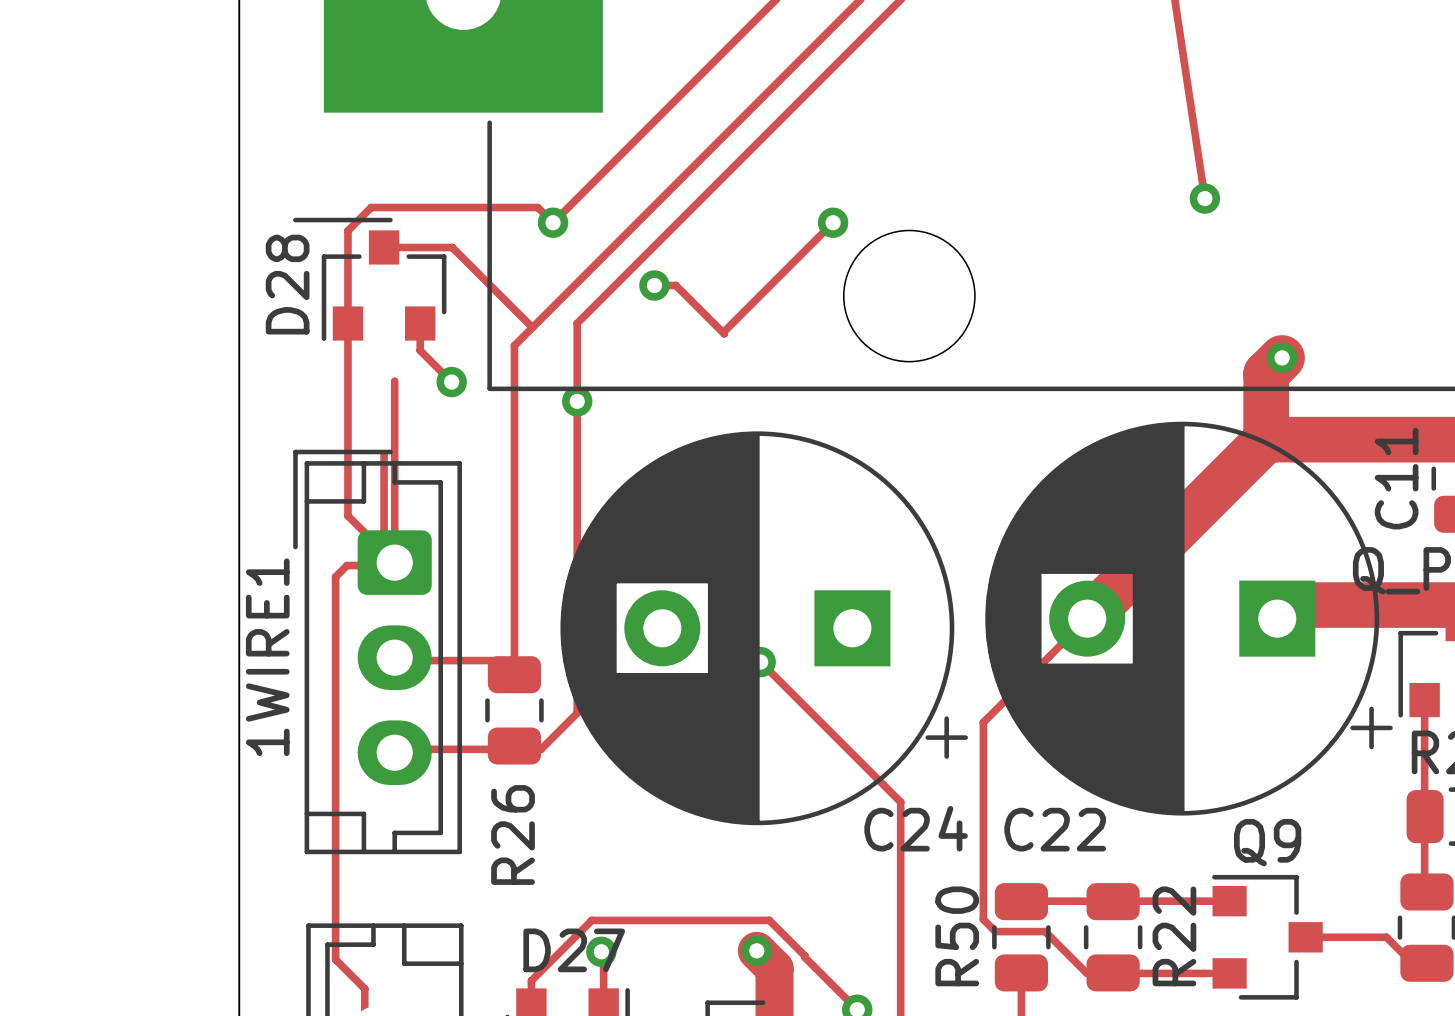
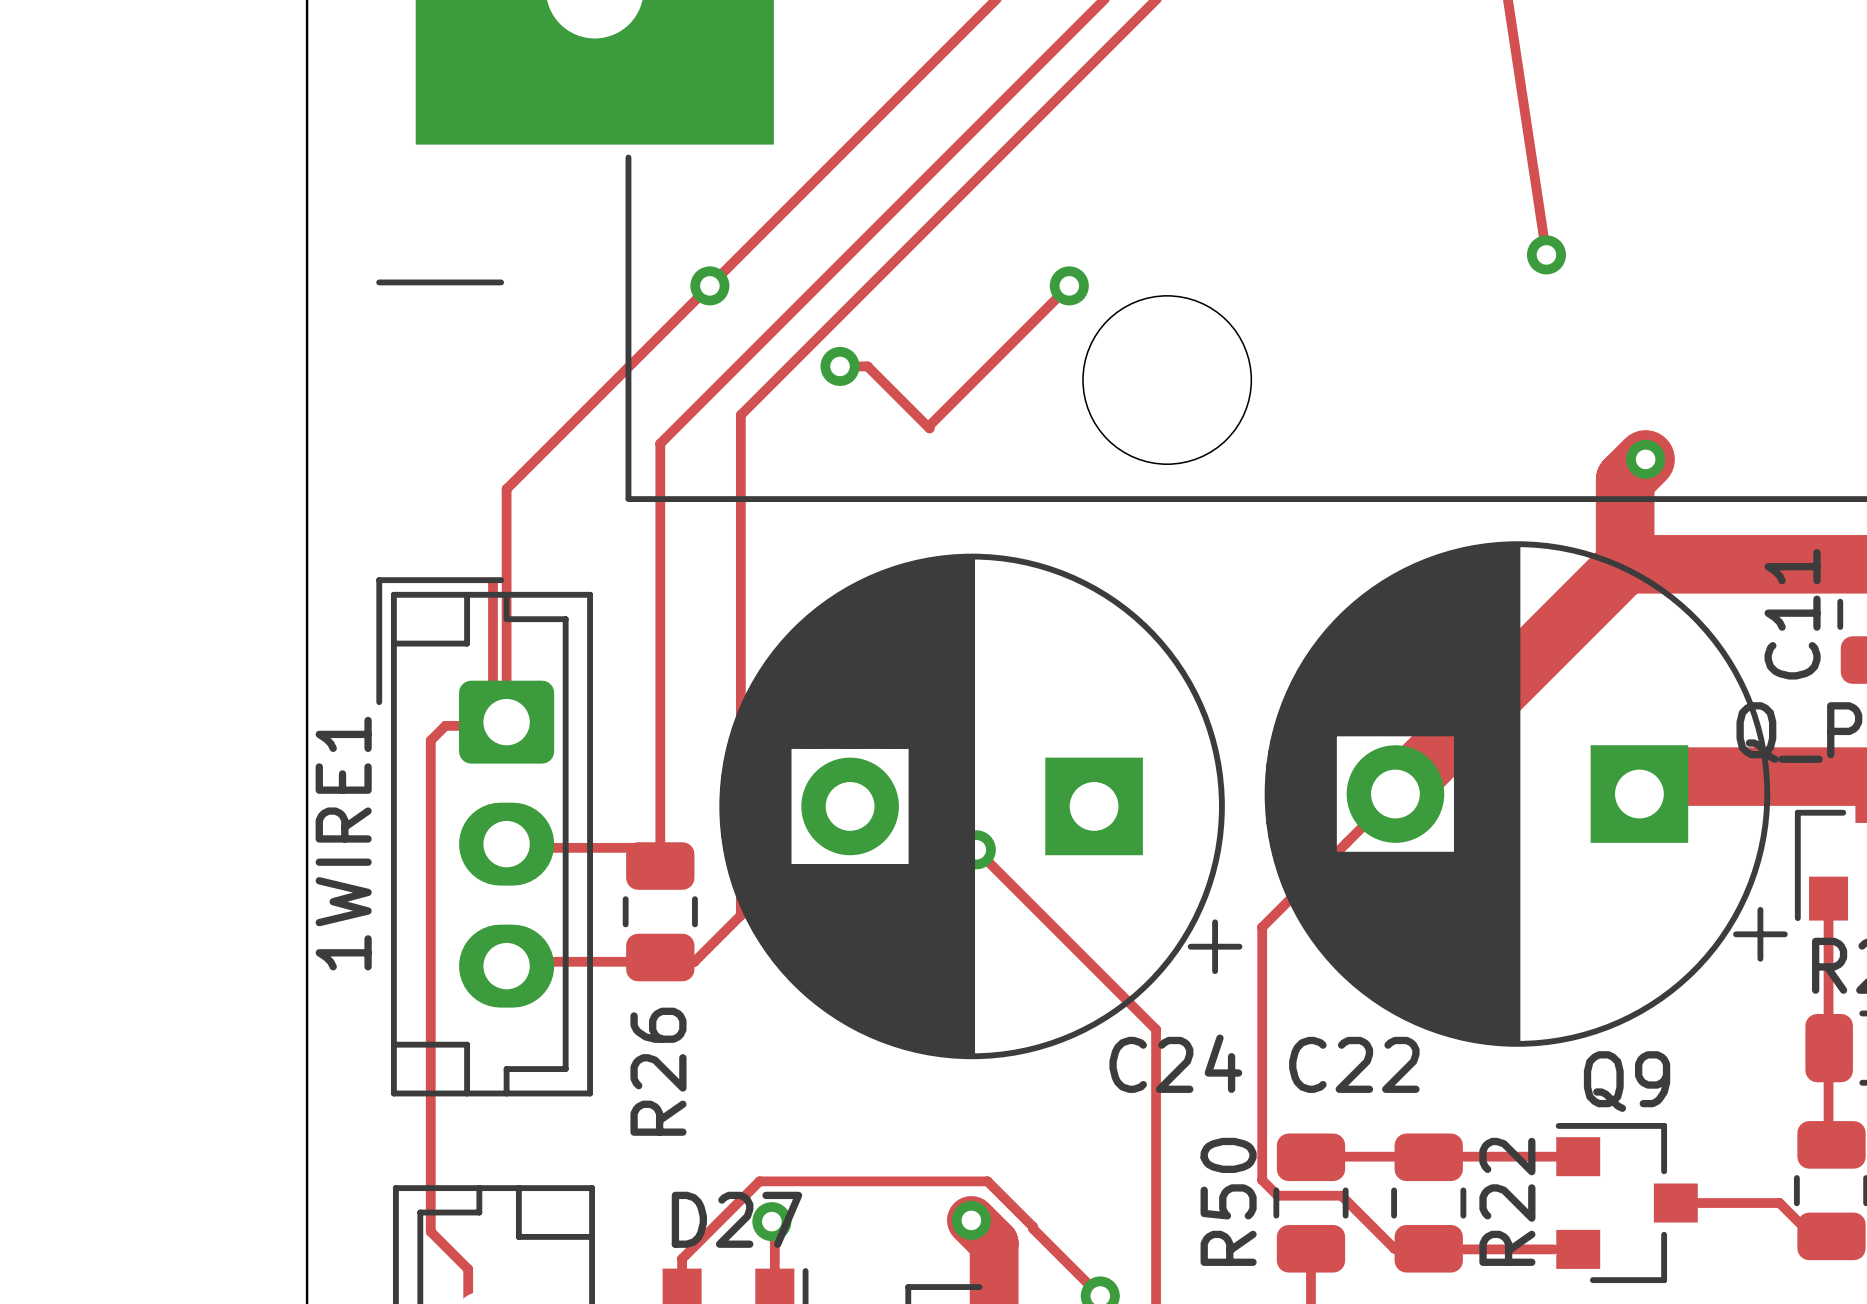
track: (553, 222) (537, 207) (371, 207) (347, 230) (347, 515) (394, 562) -> (709, 285) (506, 489)
track: (384, 247) (452, 247) (532, 327) -> none
D28: (384, 285) -> none
track: (420, 323) (420, 350) (451, 382) -> none
via: (451, 382) -> none
via: (577, 401) -> none

